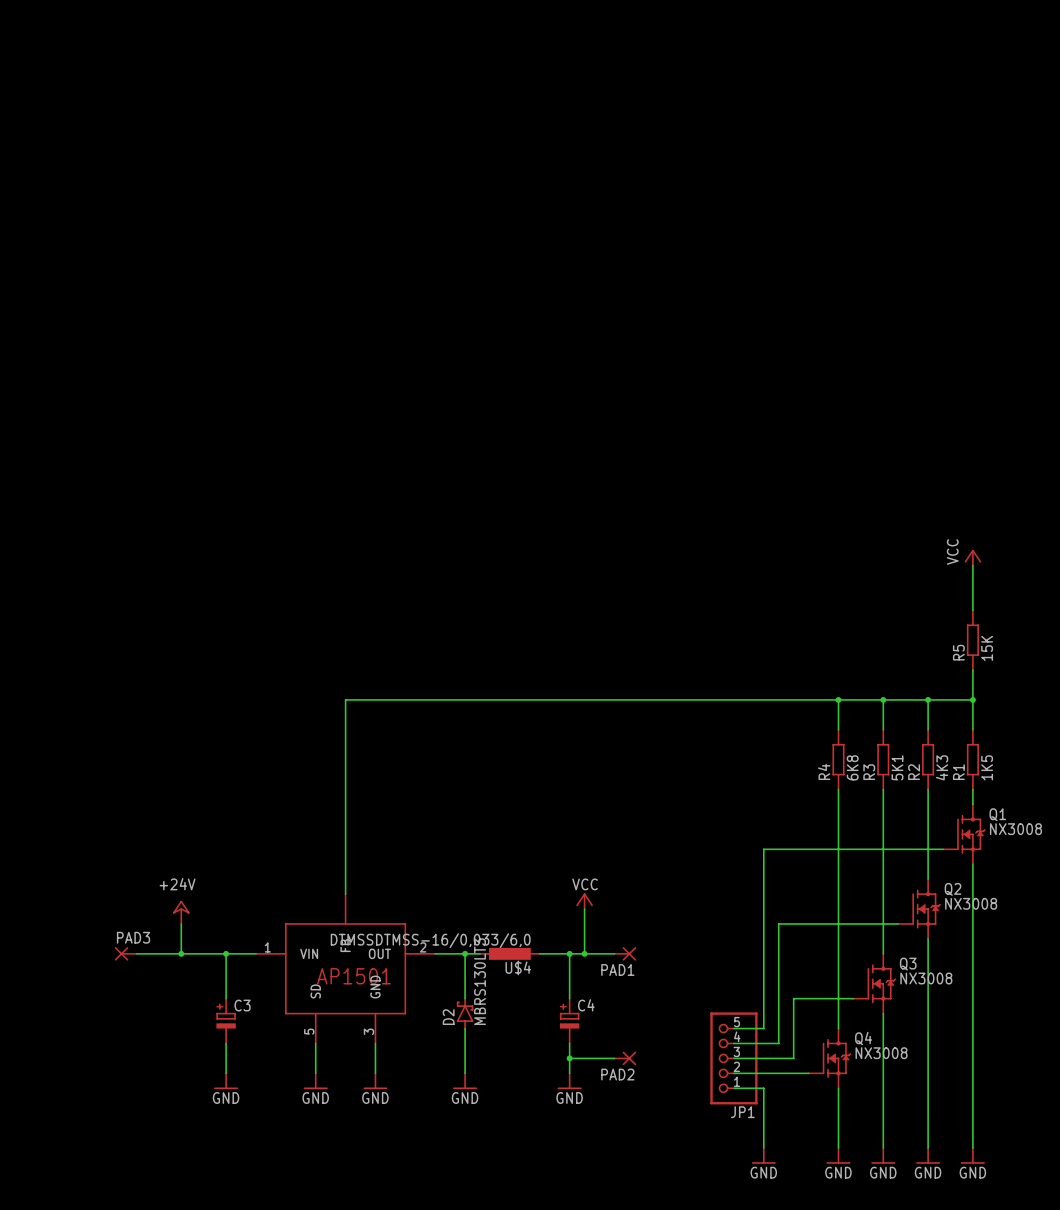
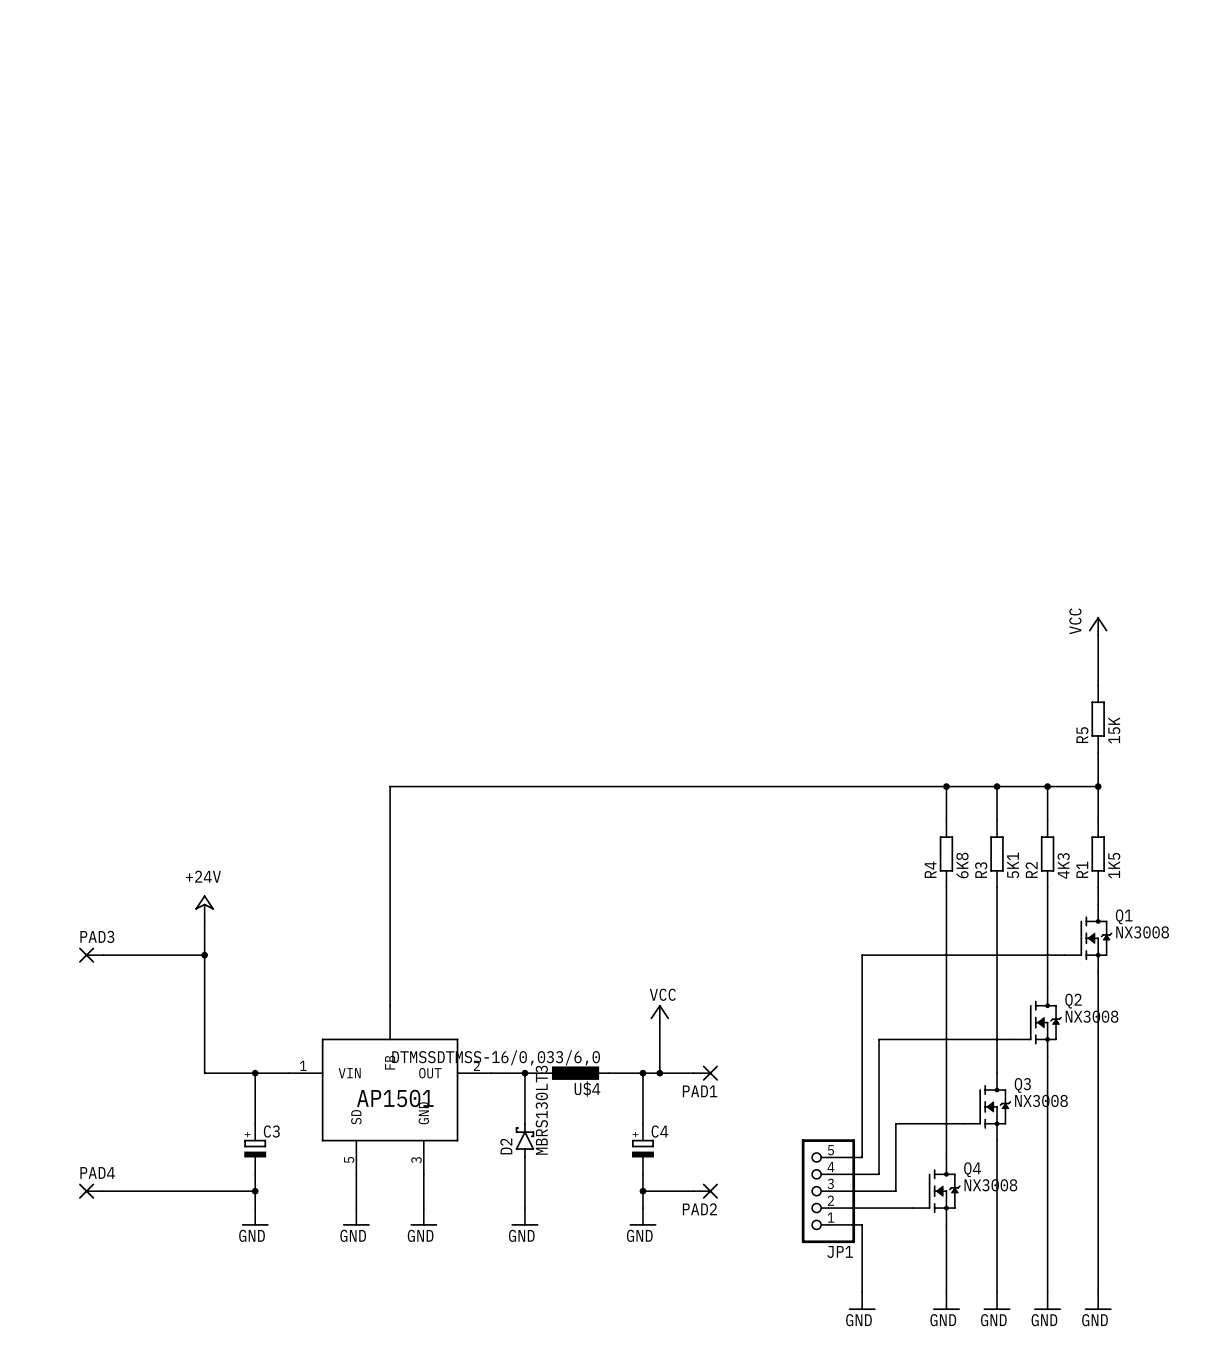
wire: none -> (204, 921) (204, 1039)
wire: none -> (103, 955) (204, 955)
junction: none -> (204, 955)
power symbol position: +24V (181, 912) -> +24V (204, 908)
PAD3 position: (125, 953) -> (91, 955)
wire: (136, 953) (181, 953) -> none
junction: (181, 953) -> none
PAD4: none -> (91, 1191)
wire: none -> (103, 1191) (255, 1191)
junction: none -> (255, 1191)

